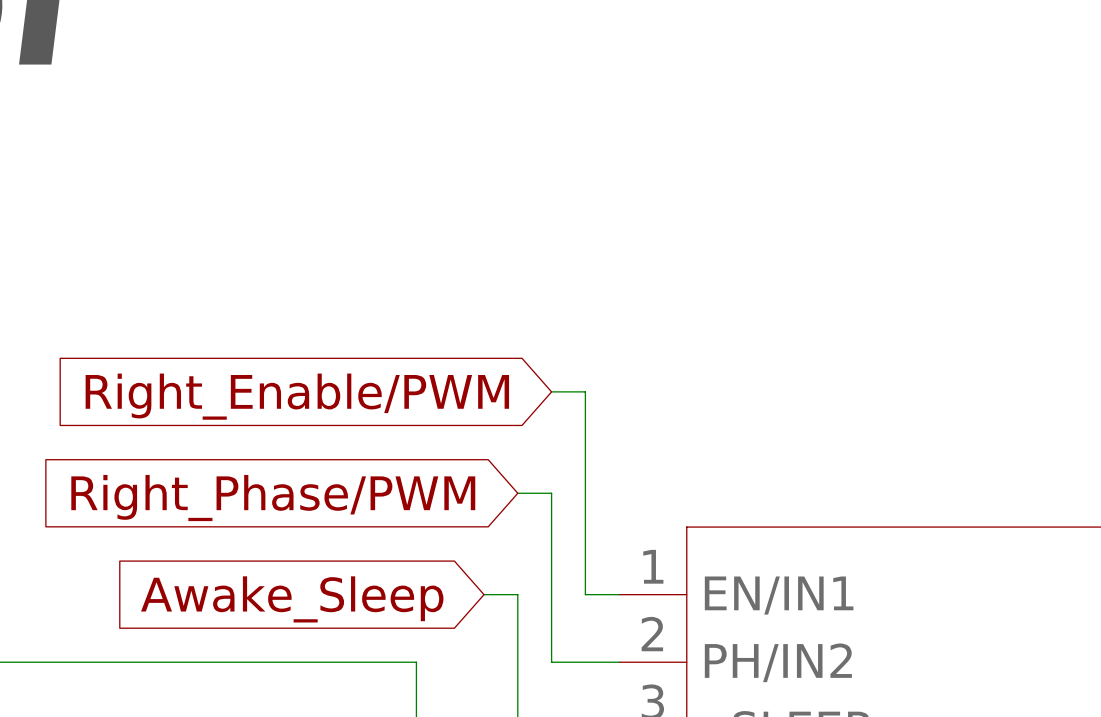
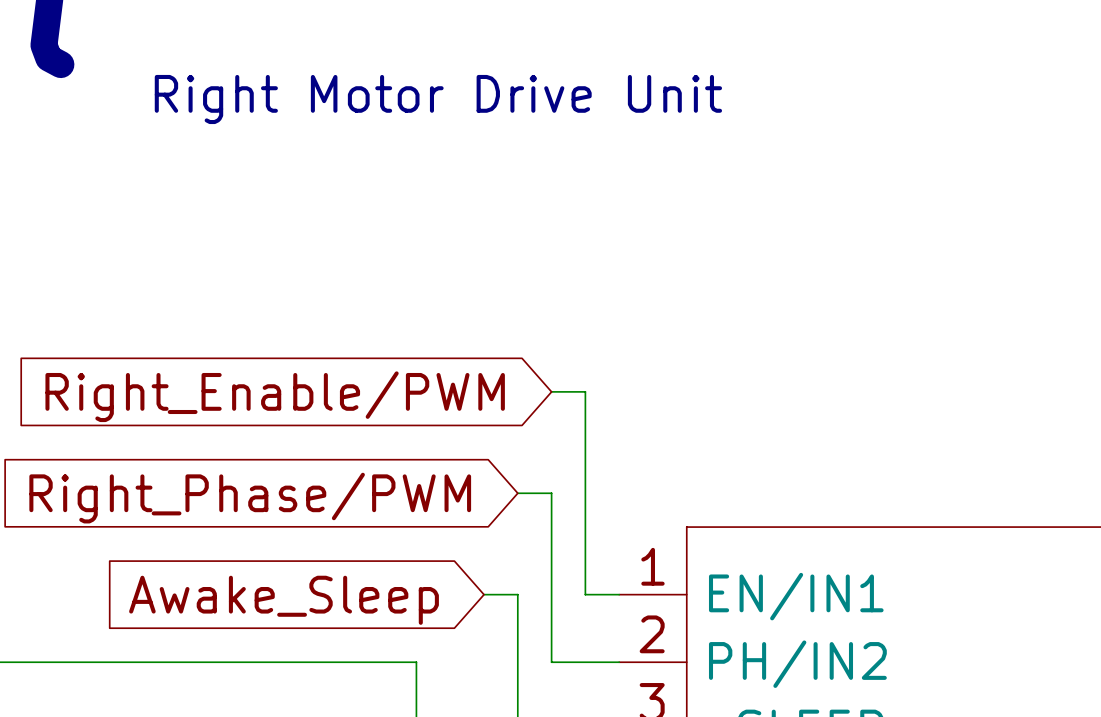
text: none -> Right Motor Drive Unit (438, 99)

